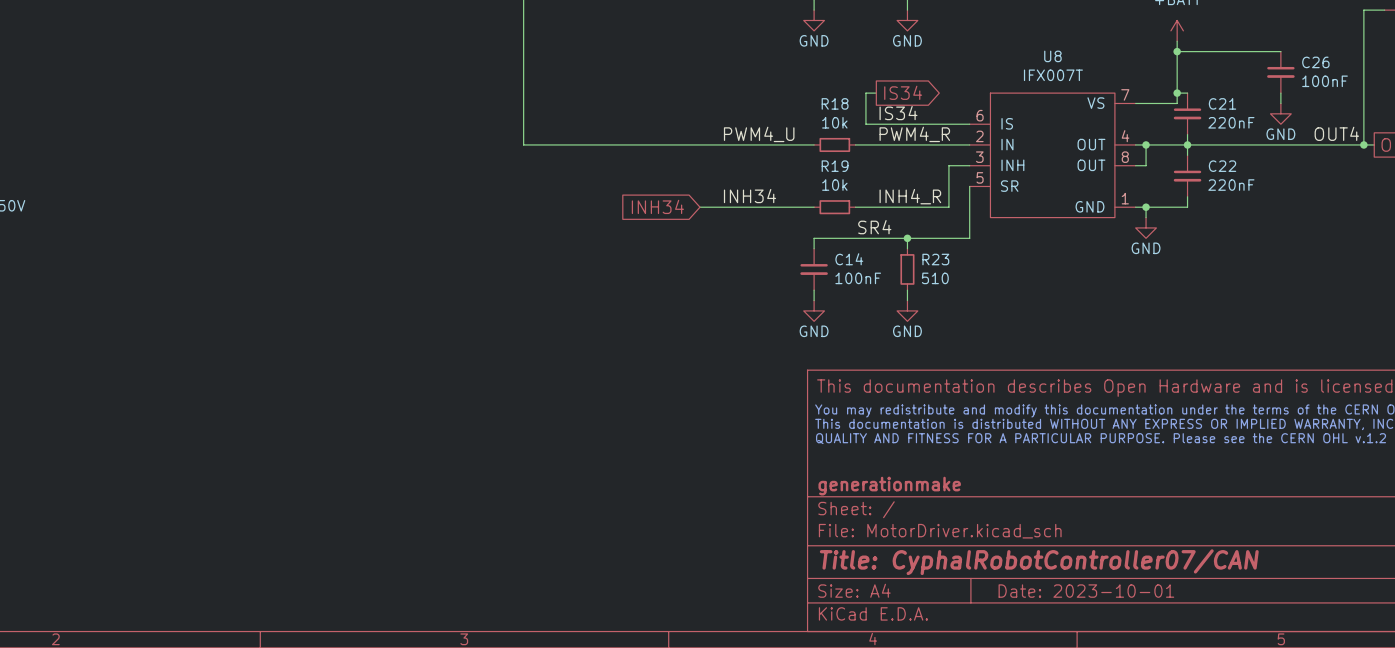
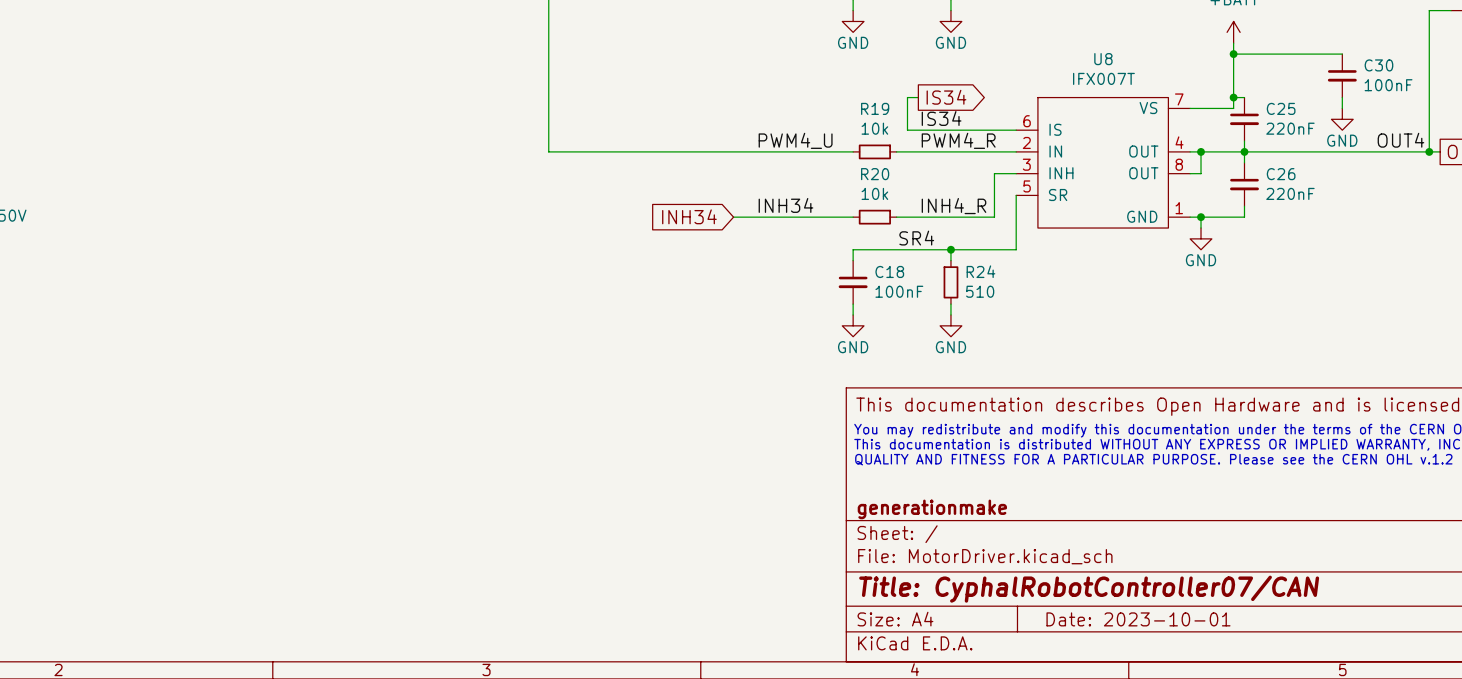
C26 name: C26 (1315, 62) -> C30 (1378, 65)
R18 name: R18 (835, 103) -> R19 (875, 108)
C21 name: C21 (1222, 103) -> C25 (1281, 108)
R19 name: R19 (835, 166) -> R20 (875, 174)
C22 name: C22 (1222, 166) -> C26 (1281, 174)
C14 name: C14 (849, 259) -> C18 (889, 271)
R23 name: R23 (935, 259) -> R24 (980, 271)

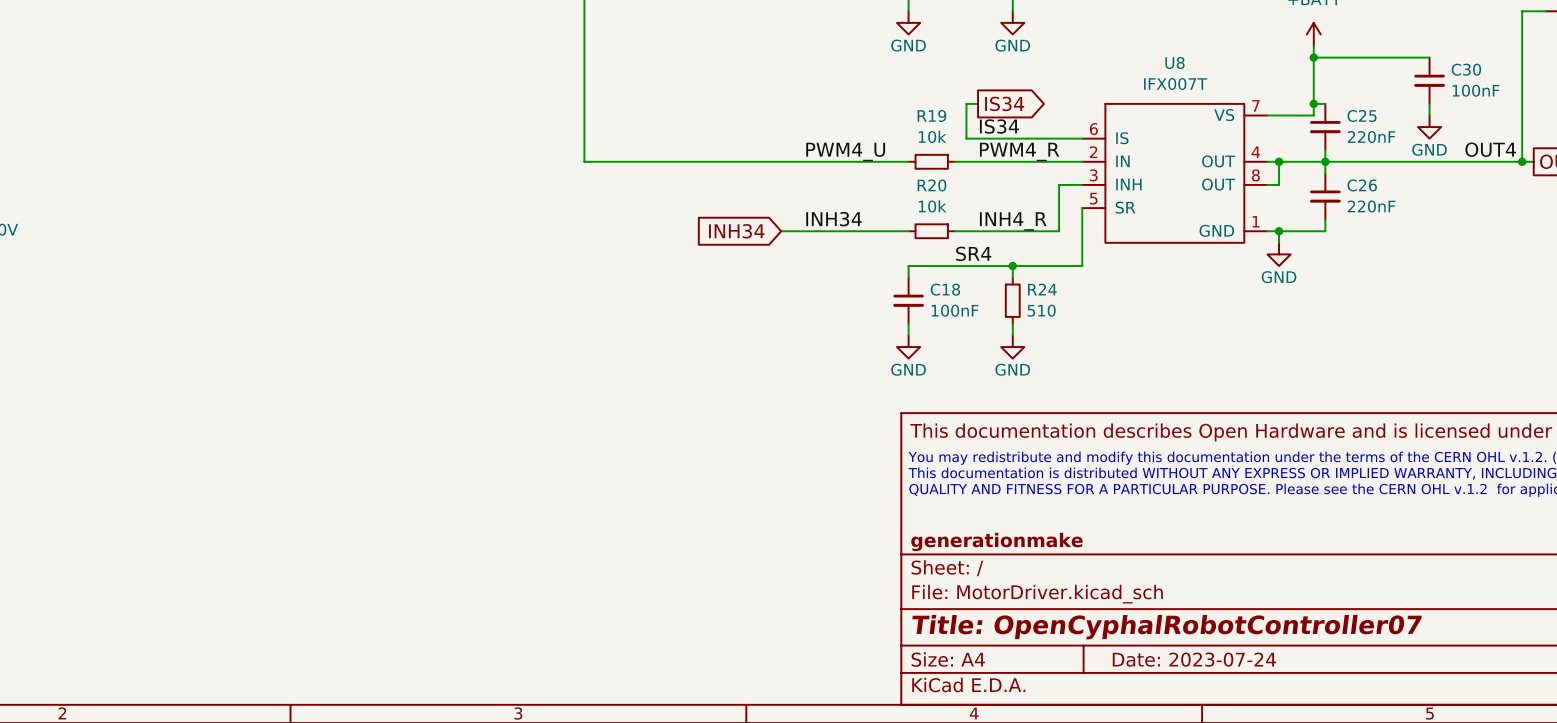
title block: Title: CyphalRobotController07/CAN (1089, 589) -> Title: OpenCyphalRobotController07 (1167, 627)
title block: Date: 2023-10-01 (1138, 619) -> Date: 2023-07-24 (1194, 659)

